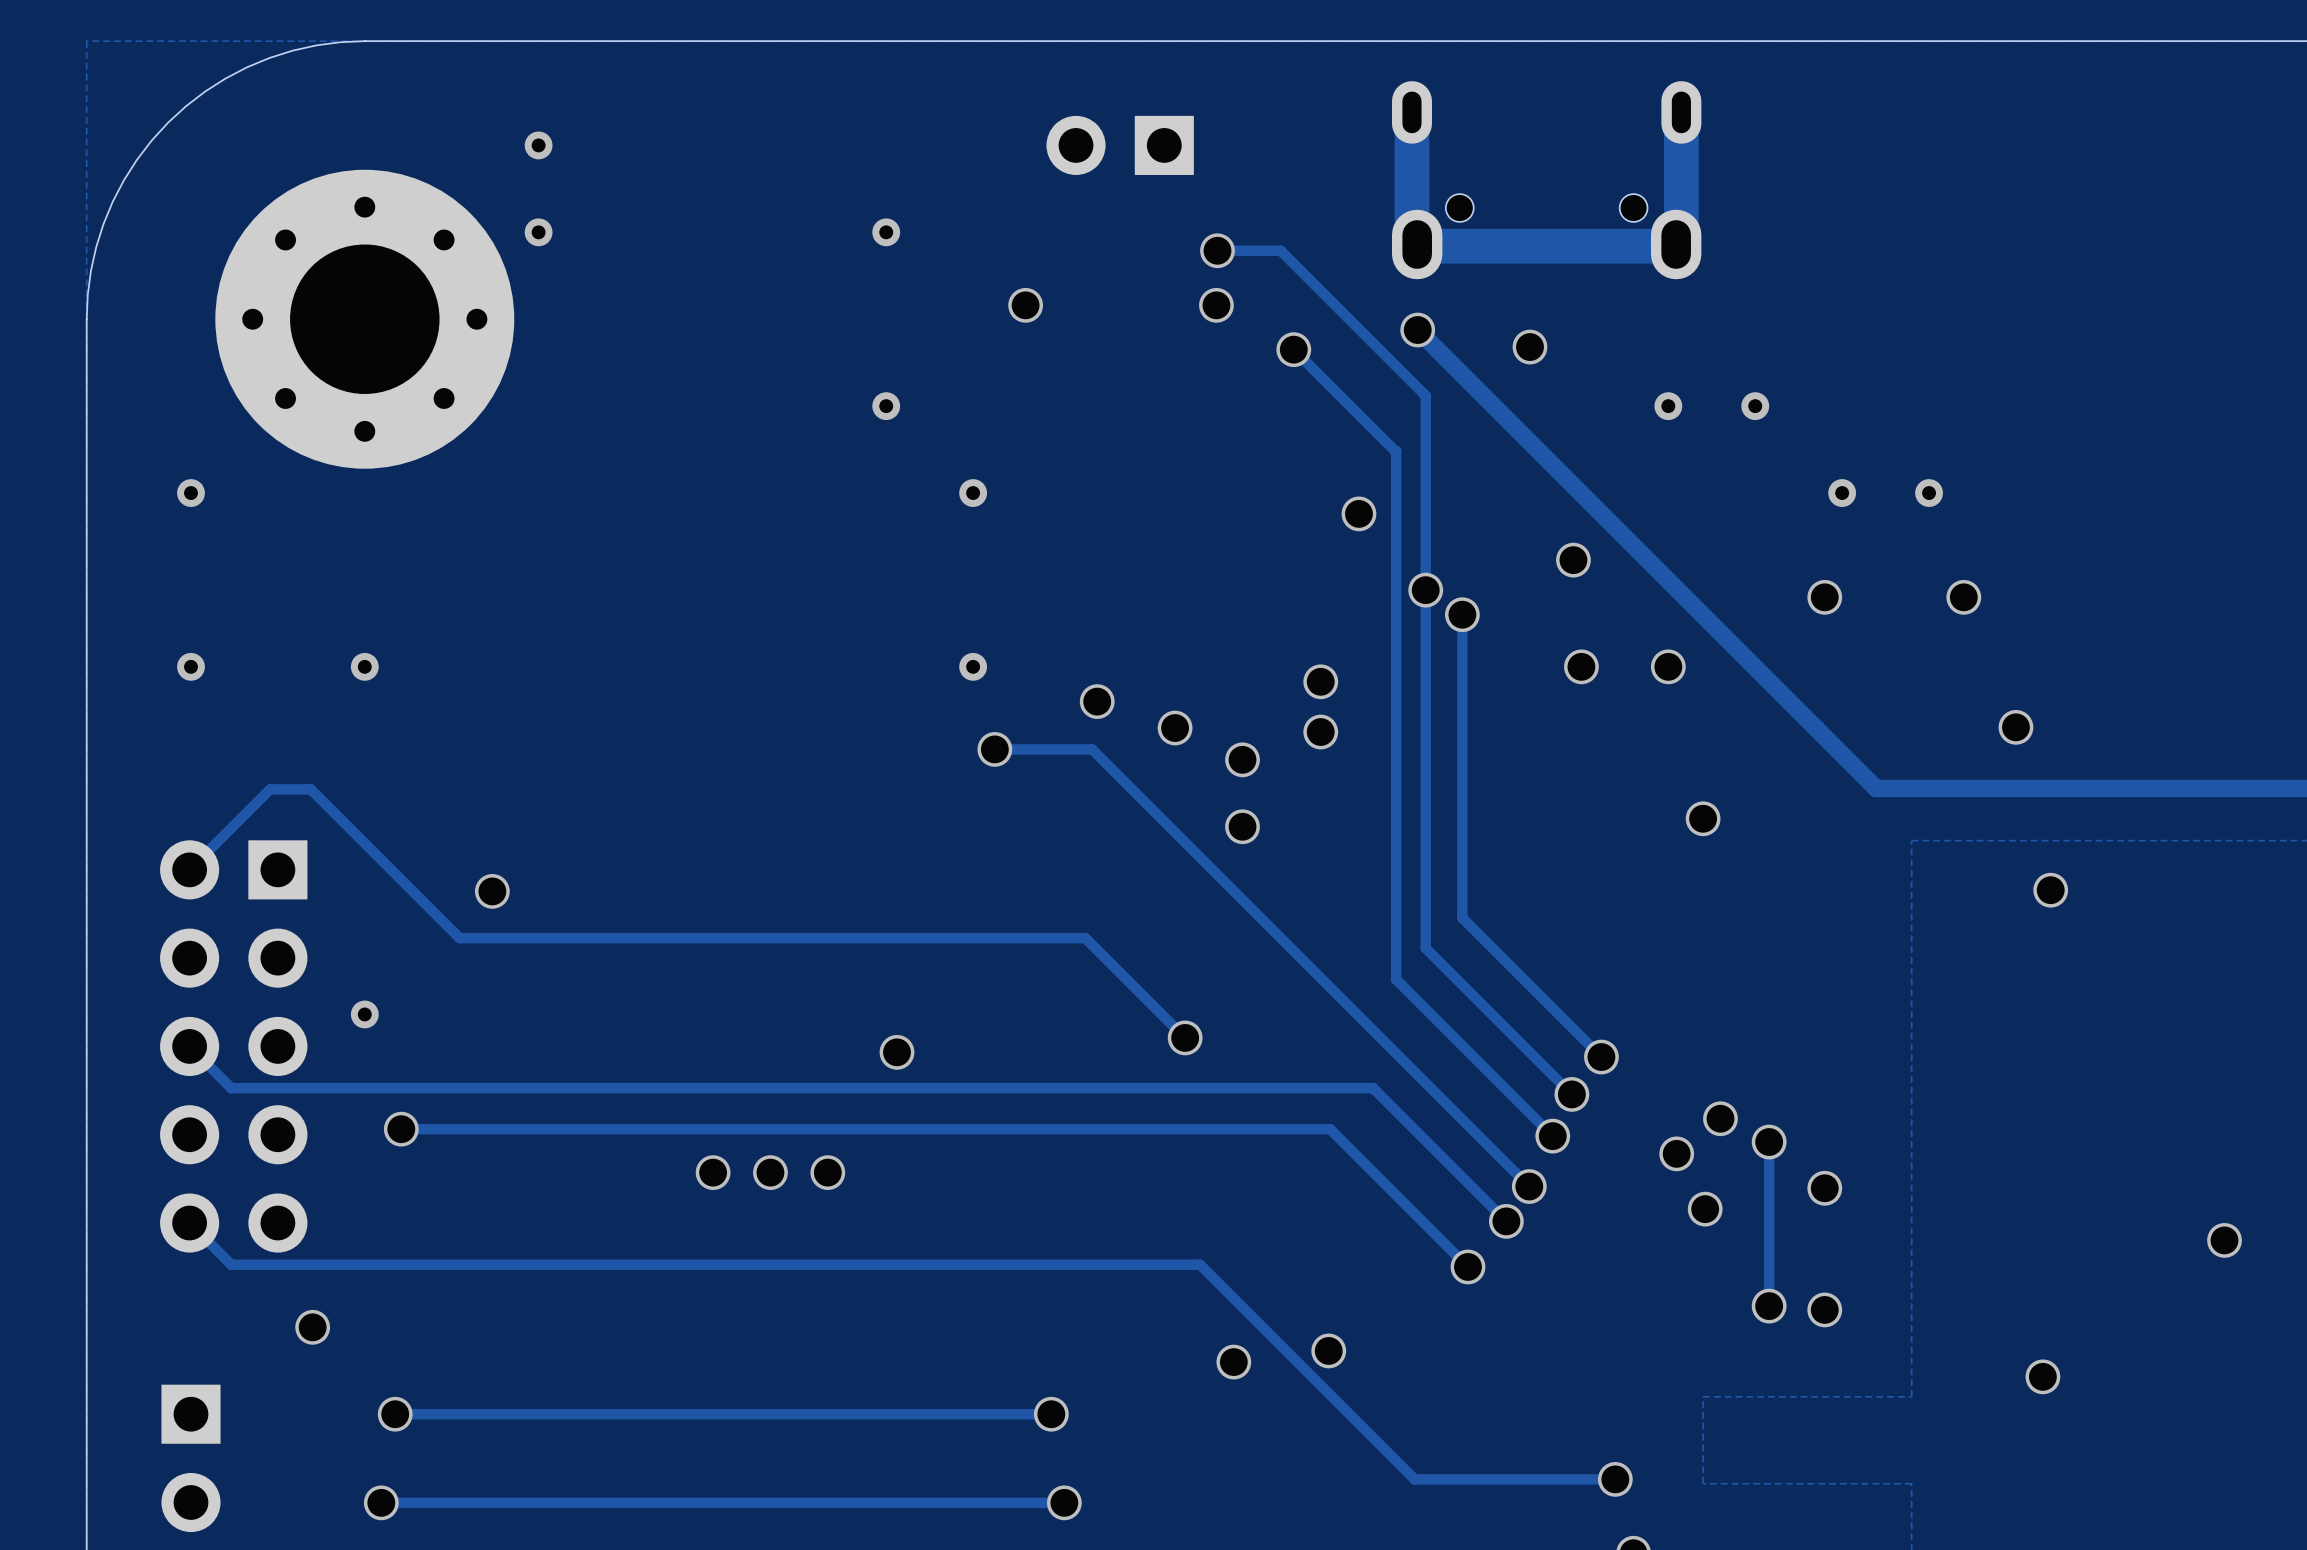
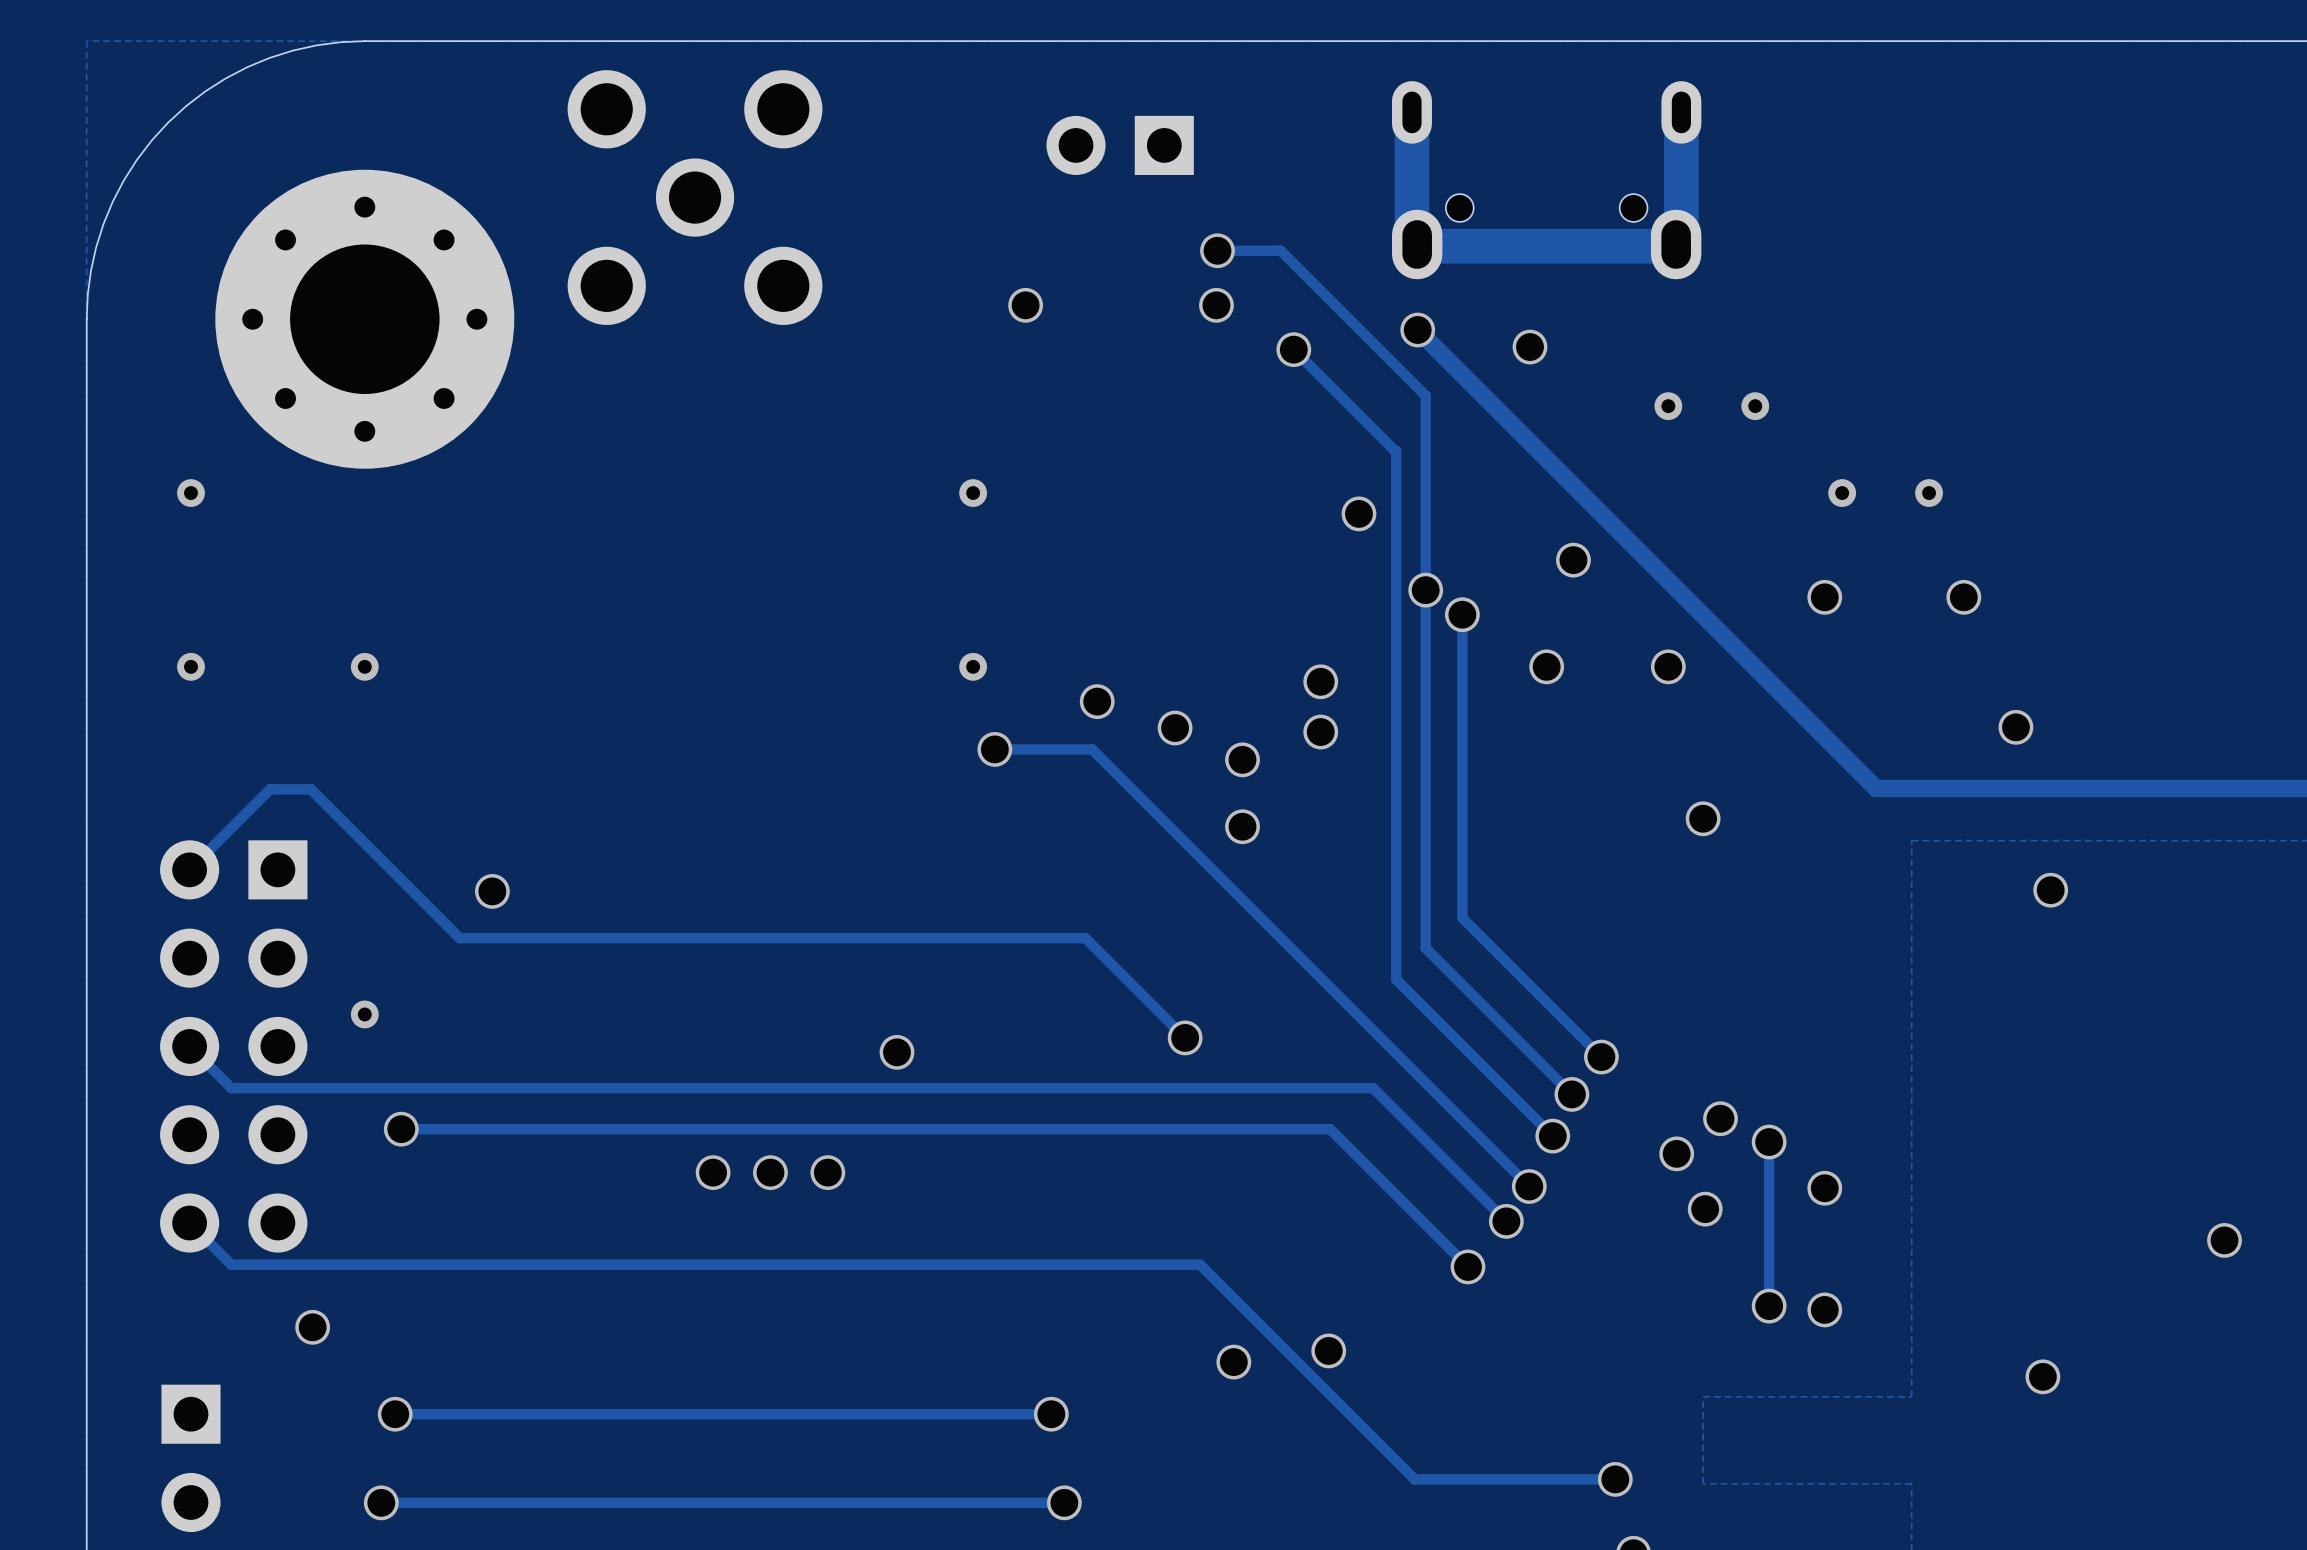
via: (538, 145) -> none
part: none -> (695, 197)
via: (538, 232) -> none
via: (886, 232) -> none
via: (886, 406) -> none
via position: (1581, 666) -> (1546, 666)

